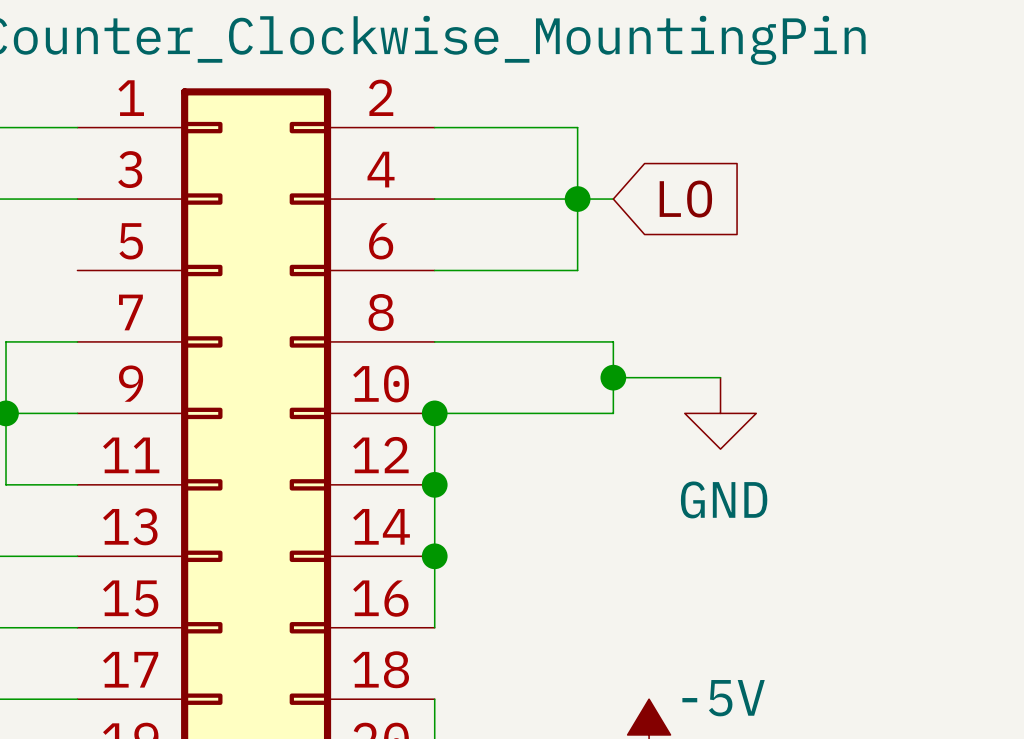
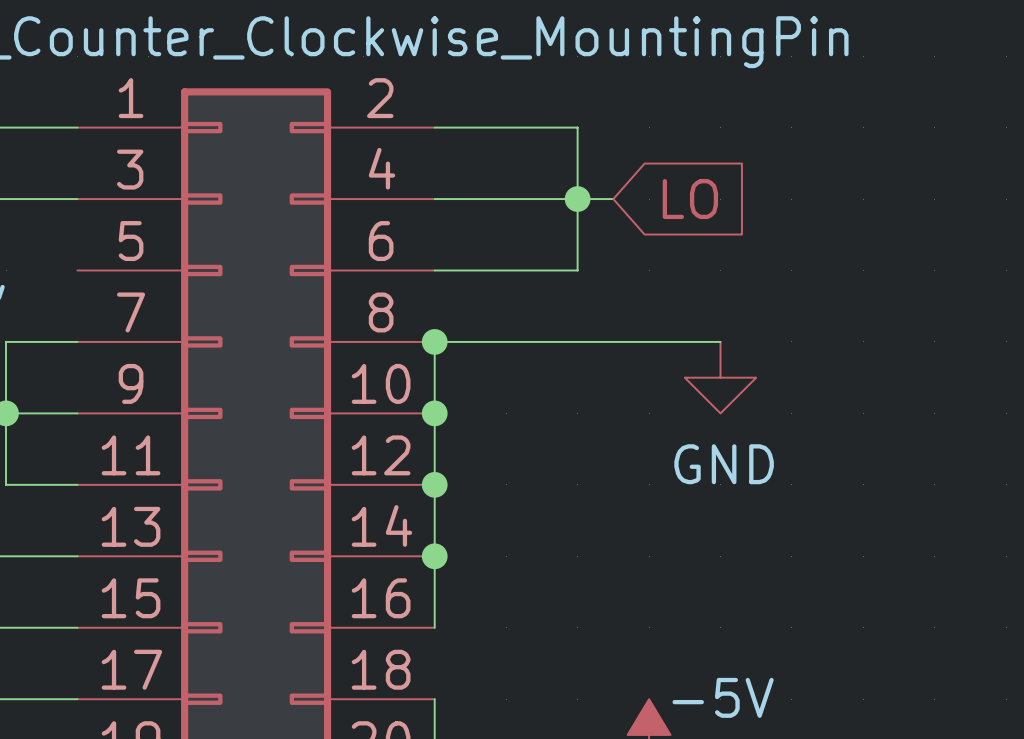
junction: none -> (434, 341)
wire: (613, 341) (613, 413) (434, 413) -> (434, 341) (434, 413)
wire: (613, 377) (720, 377) -> (613, 341) (720, 341)
junction: (613, 377) -> none
power symbol position: GND (720, 413) -> GND (720, 377)

